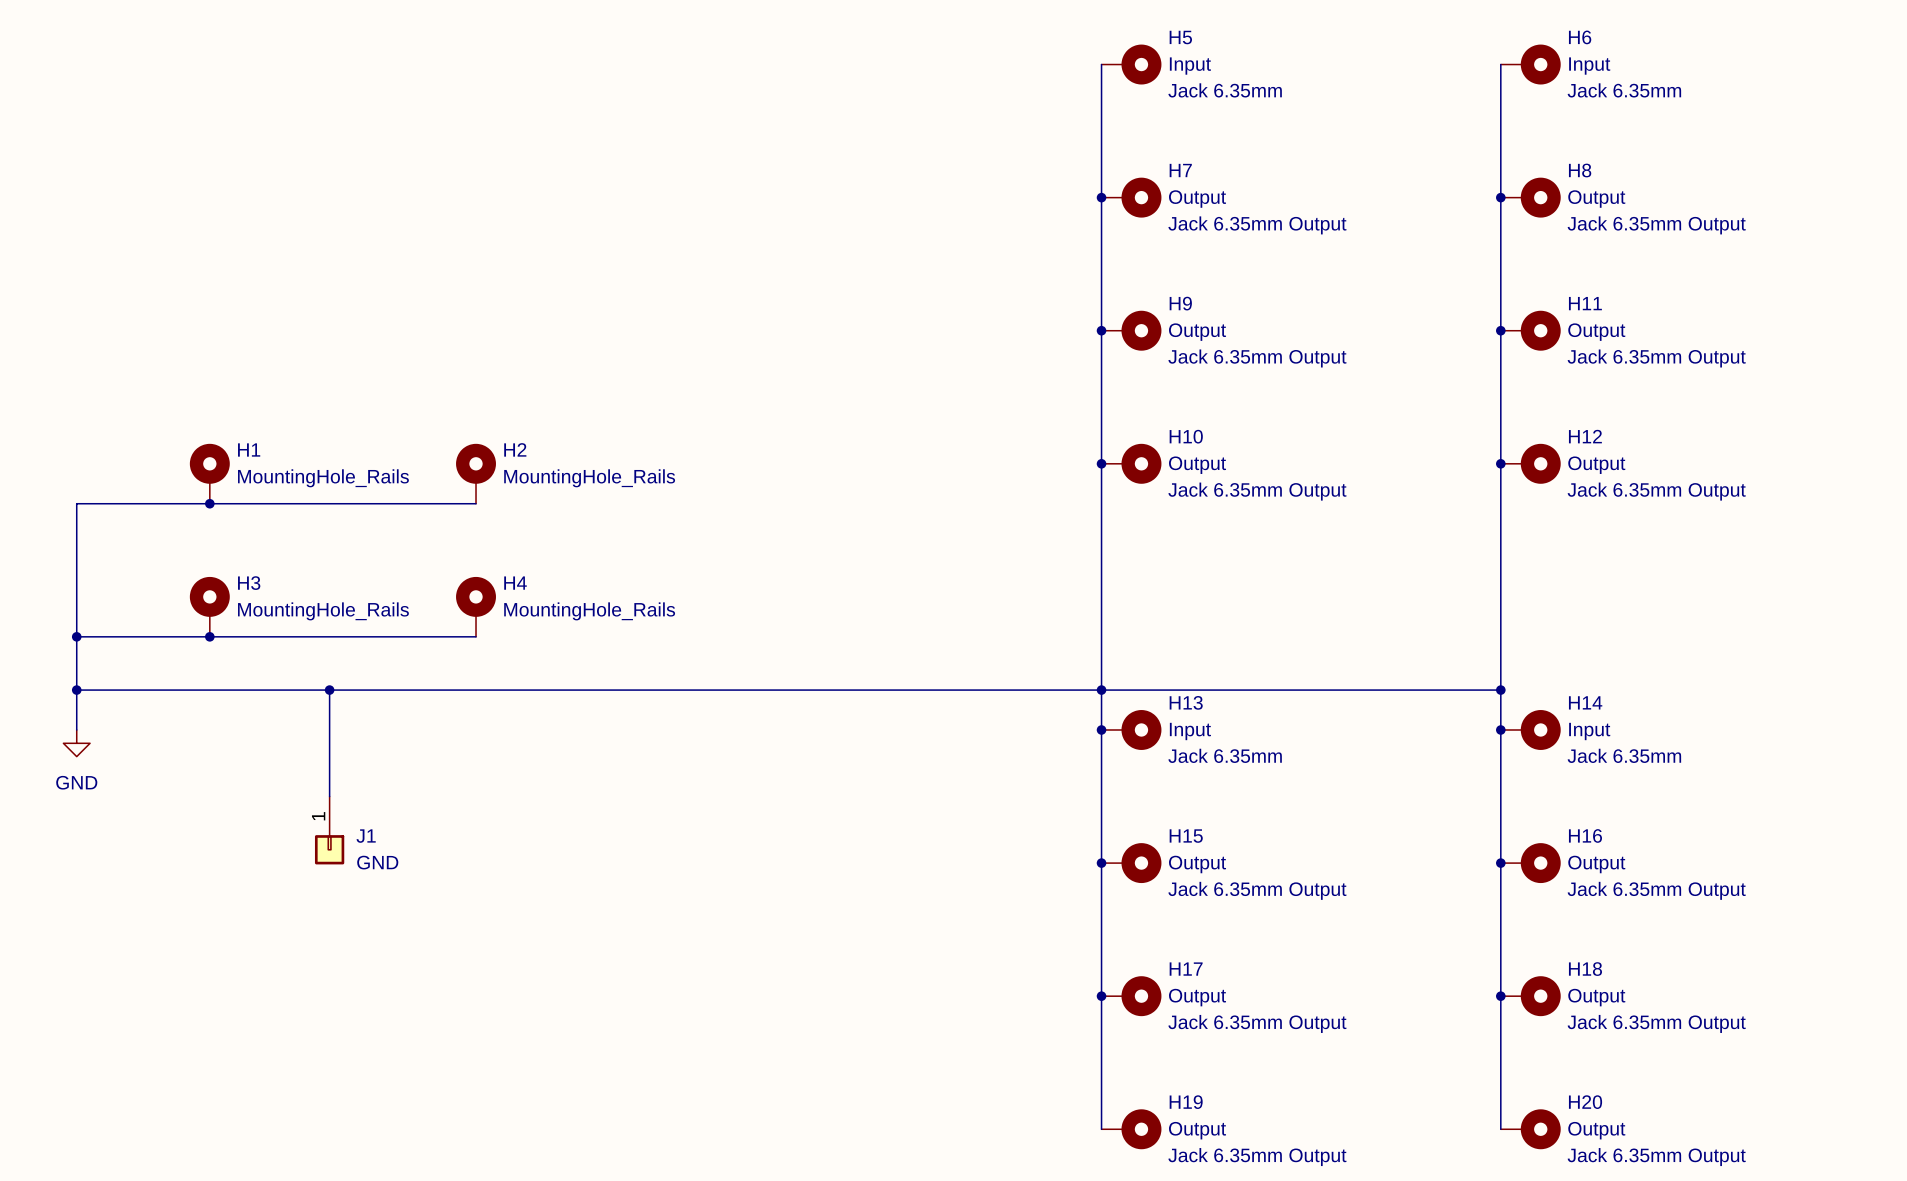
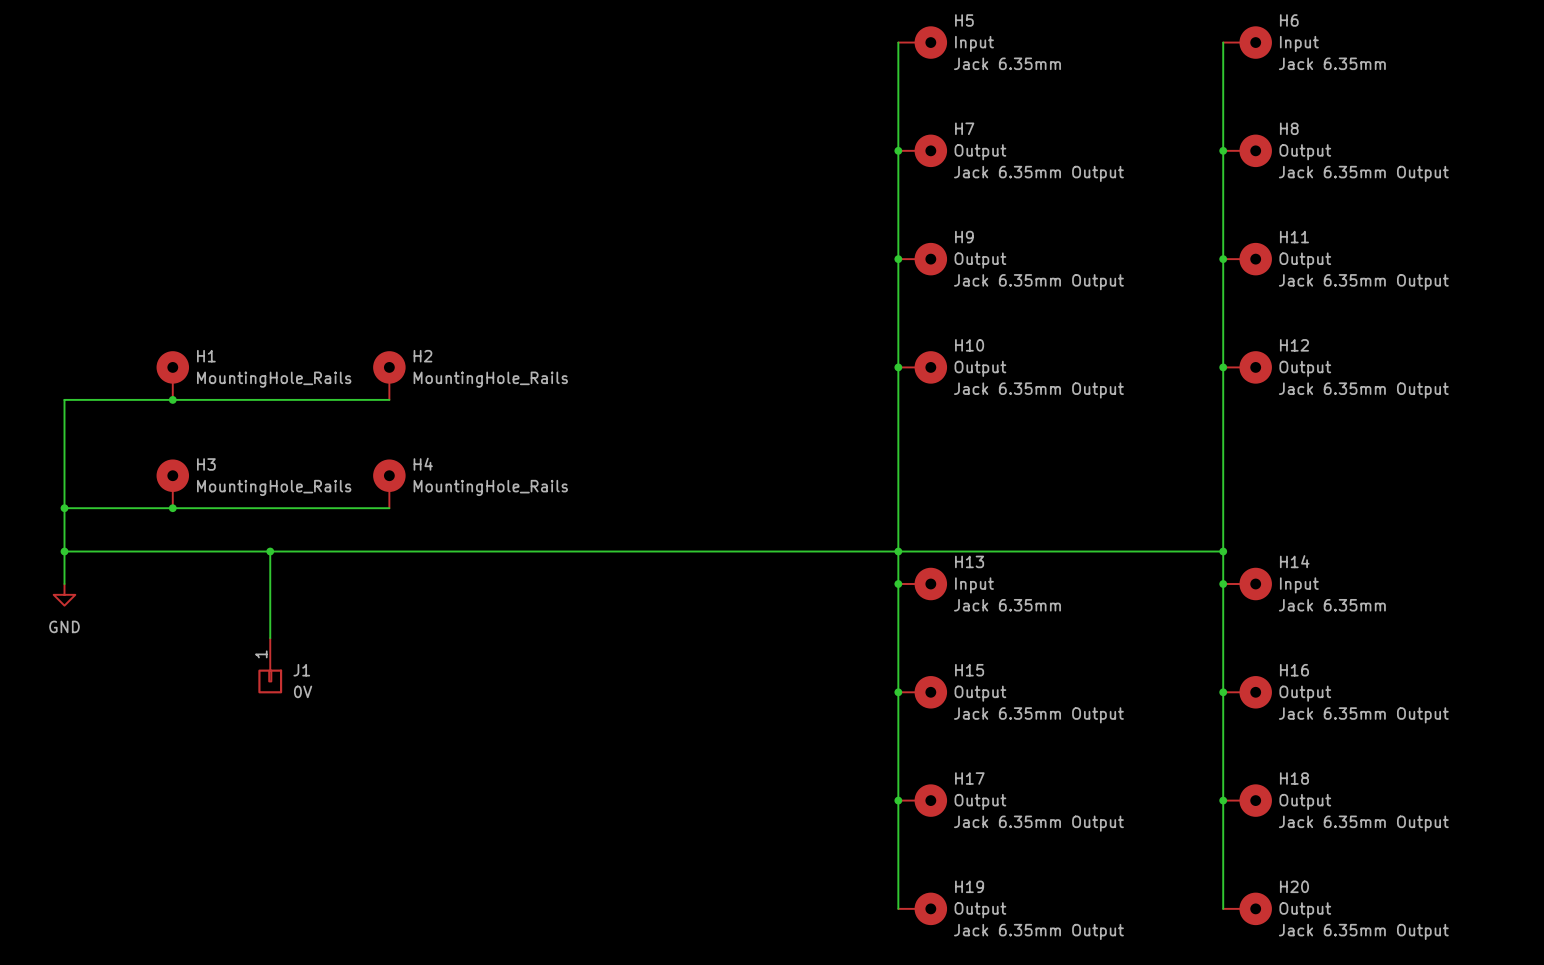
J1 value: GND (377, 862) -> 0V (303, 691)

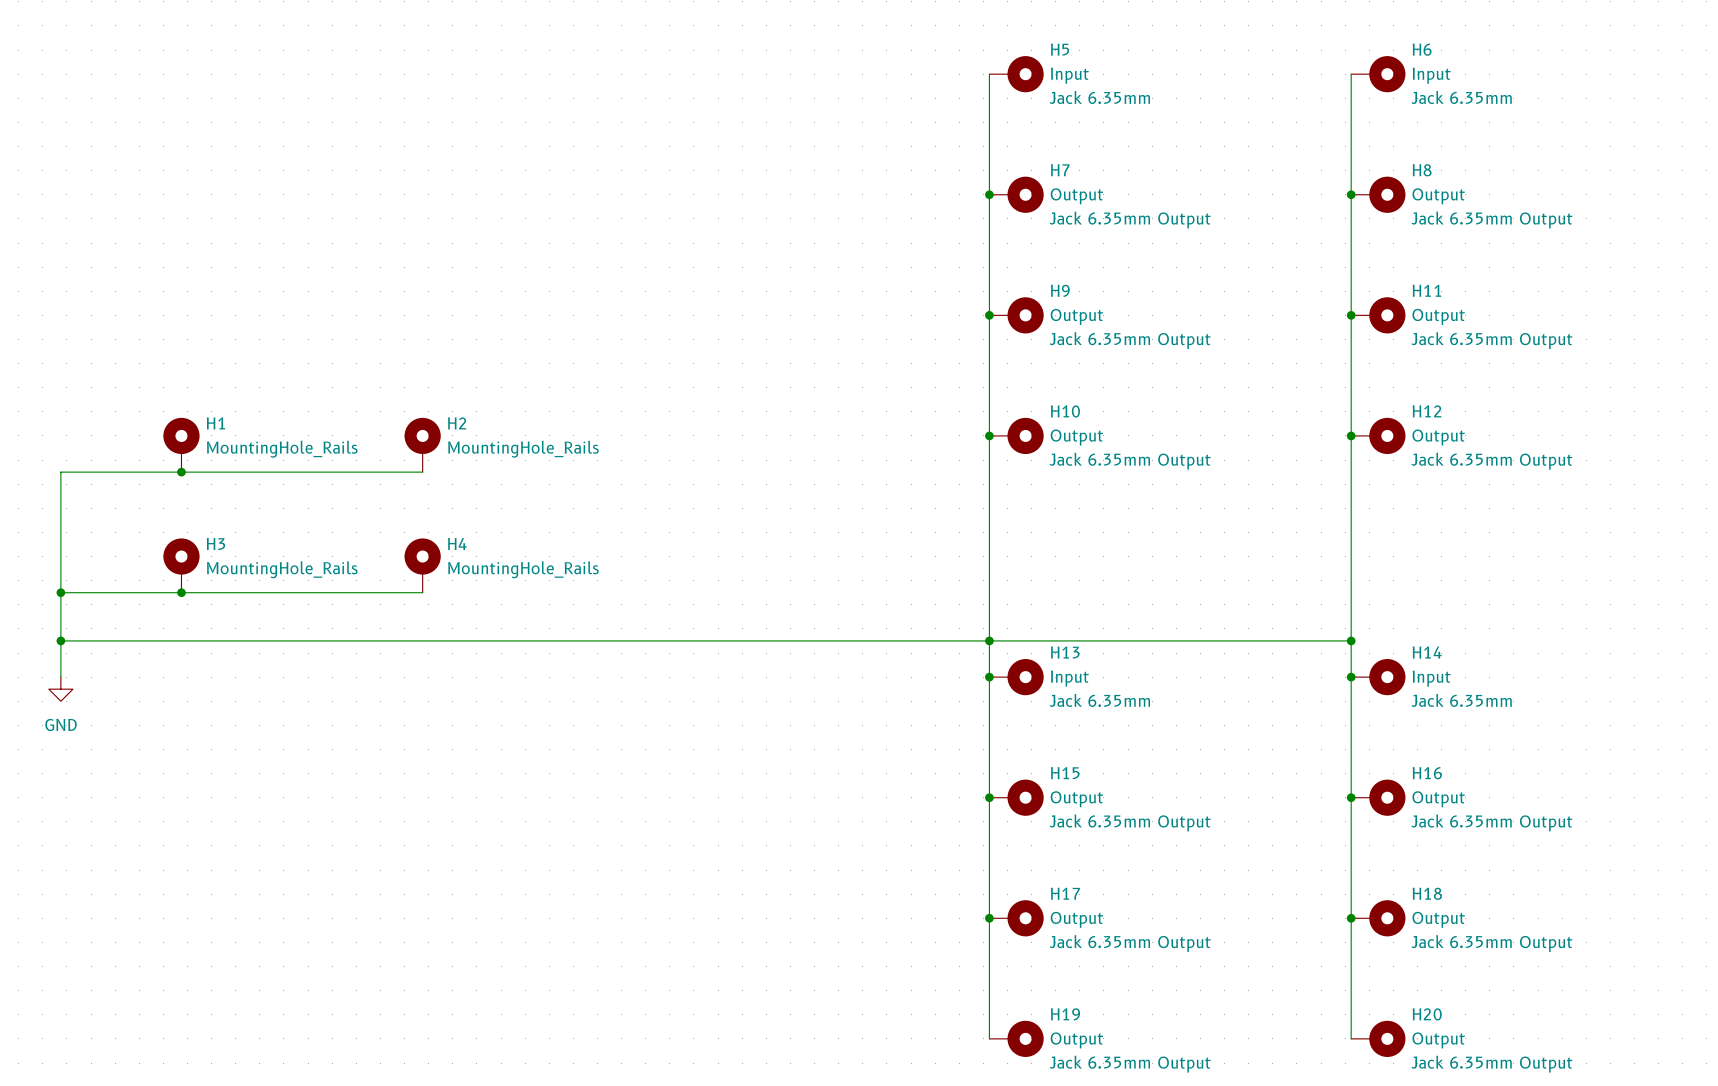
wire: (270, 551) (270, 638) -> none
junction: (270, 551) -> none
J1: 0V (270, 665) -> none

